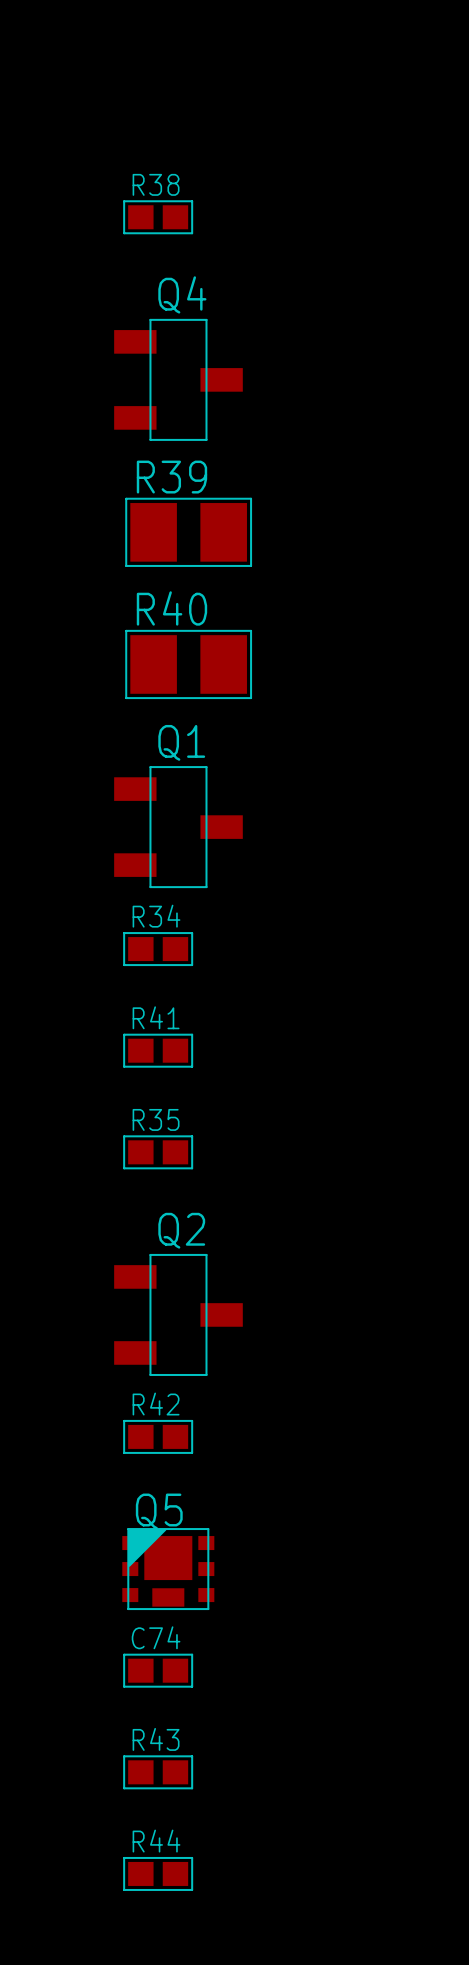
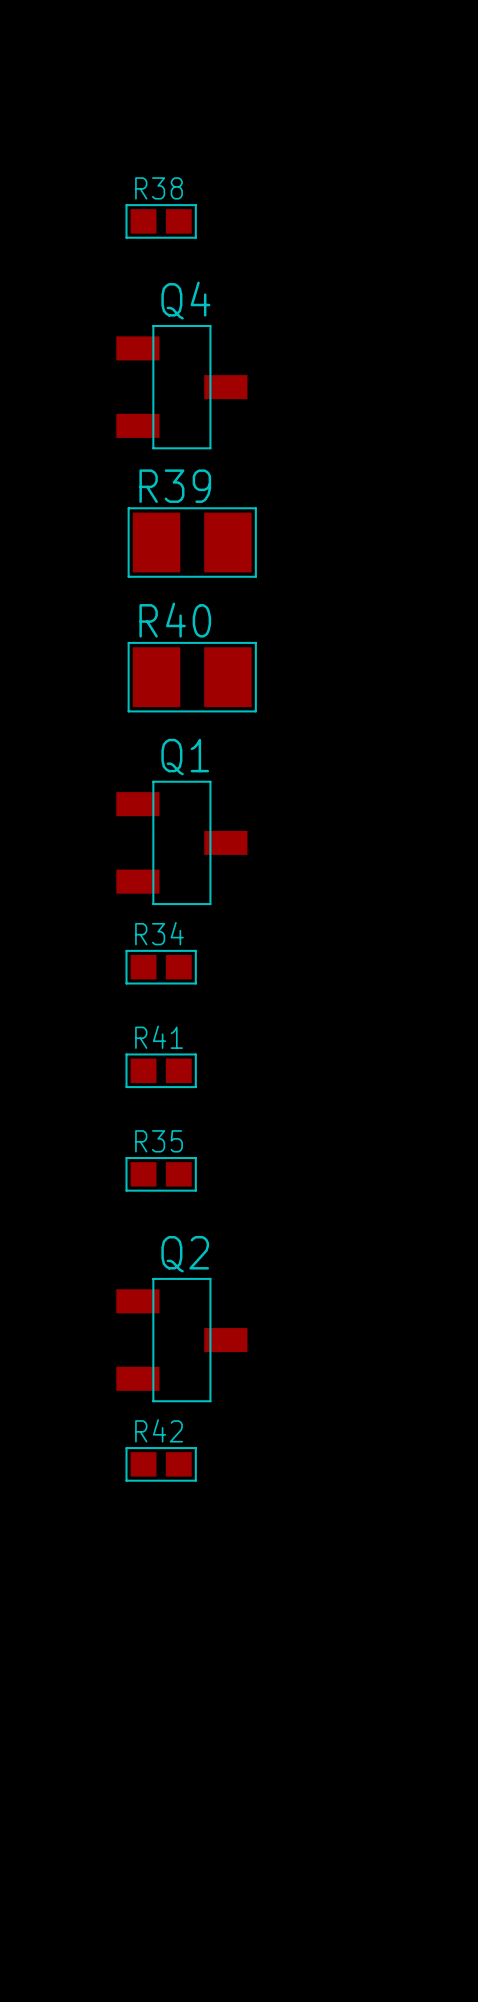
Q5: (168, 1569) -> none
C74: (158, 1670) -> none
R43: (158, 1772) -> none
R44: (158, 1873) -> none

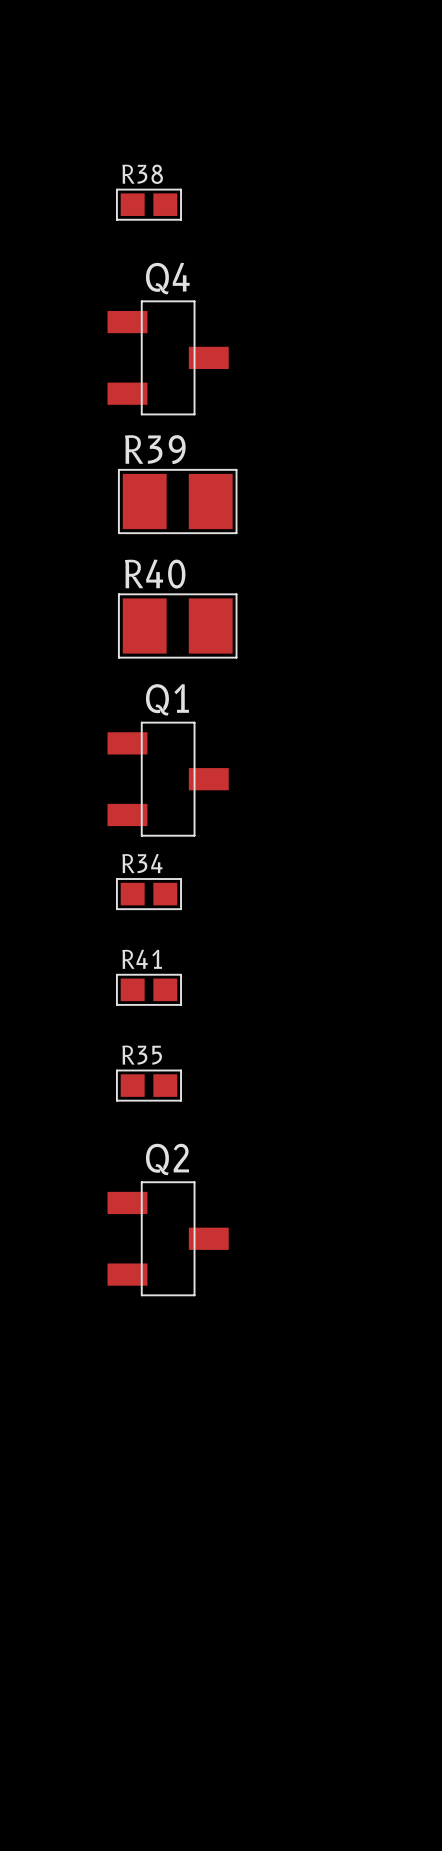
R42: (161, 1464) -> none

